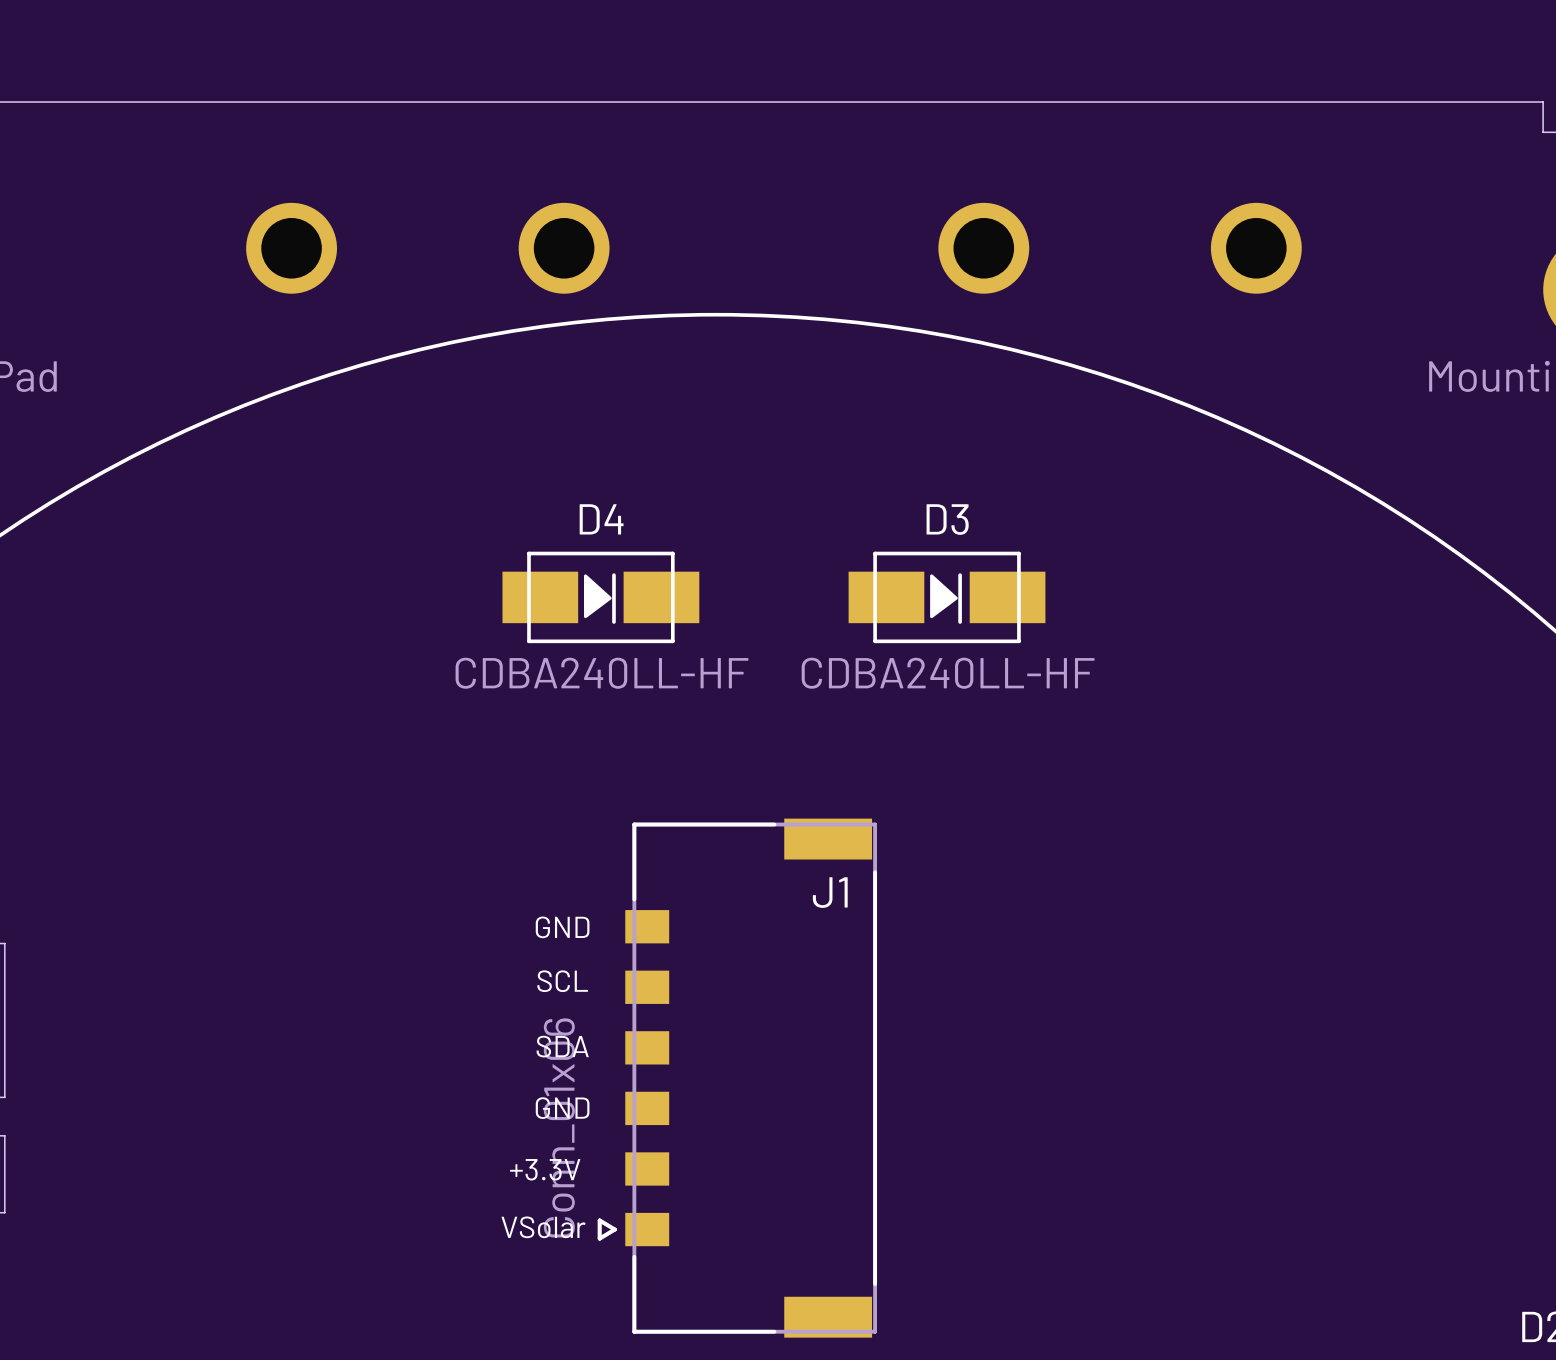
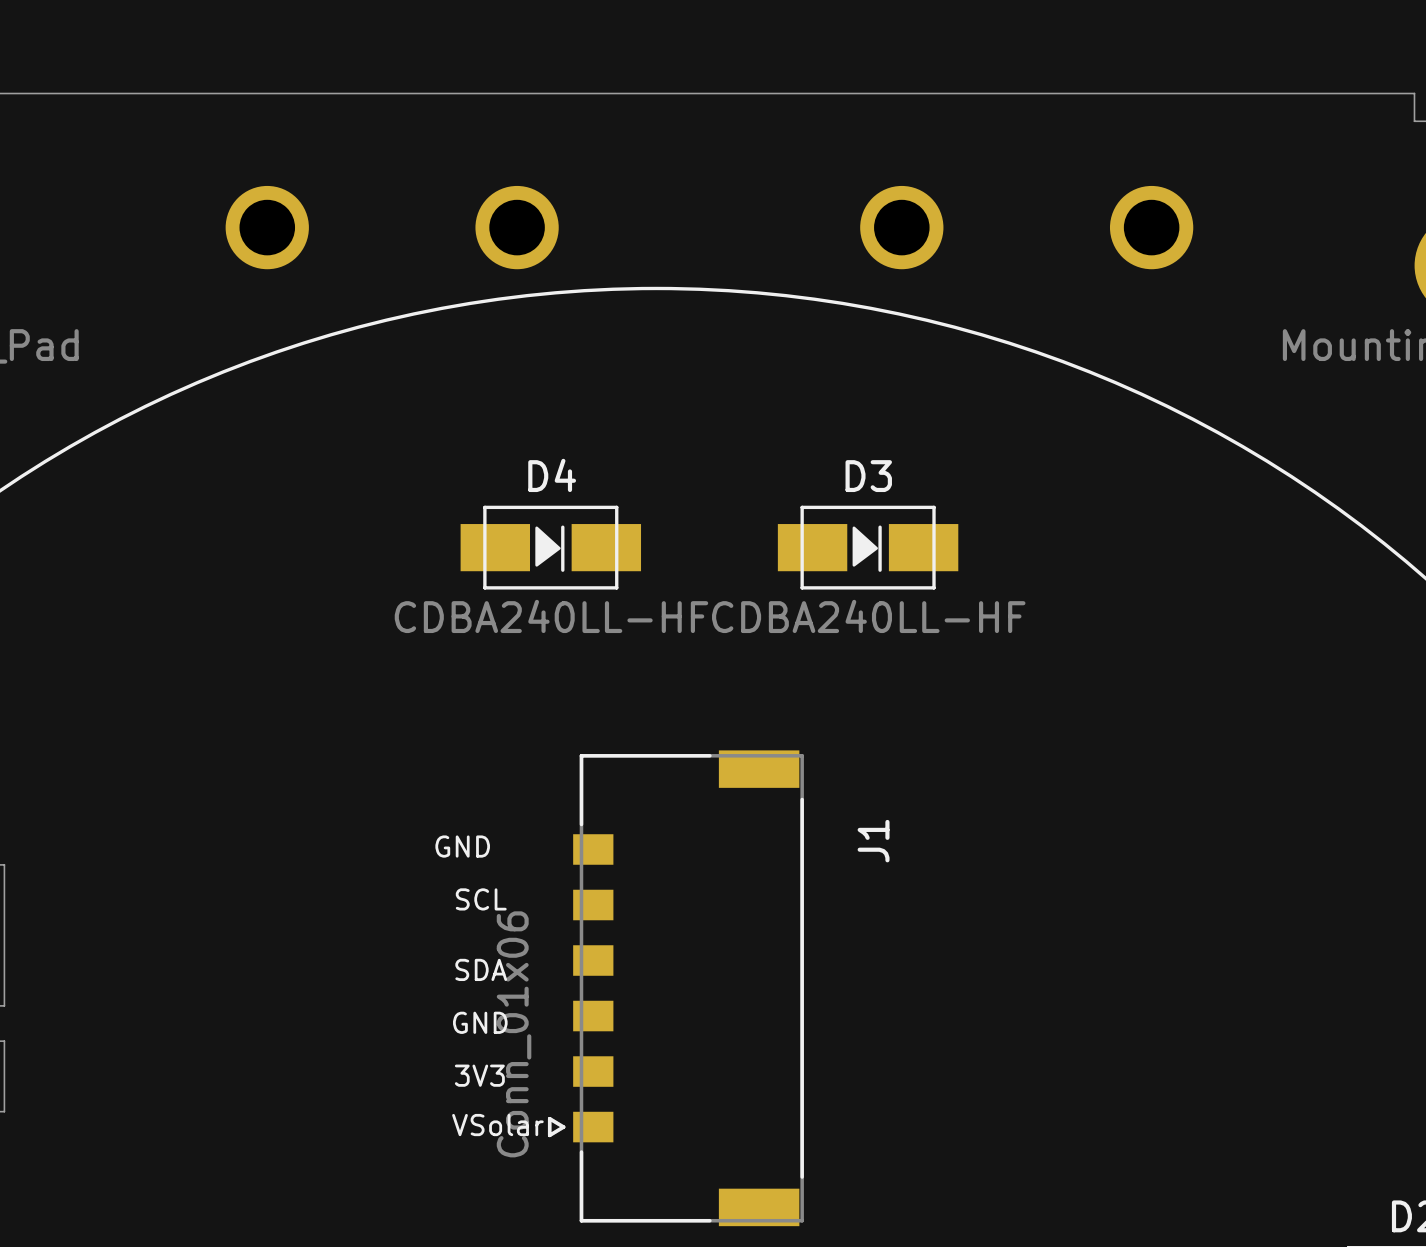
J1 name rotation: 0° (830, 892) -> 90° counterclockwise (873, 841)
J1 name position: J1 (830, 892) -> J1 (873, 841)
text position: GND (562, 927) -> GND (462, 846)
text position: SCL (562, 981) -> SCL (481, 899)
text position: SDA (562, 1046) -> SDA (481, 969)
text position: GND (562, 1108) -> GND (480, 1022)
text: +3.3V (545, 1169) -> 3V3 (479, 1075)

